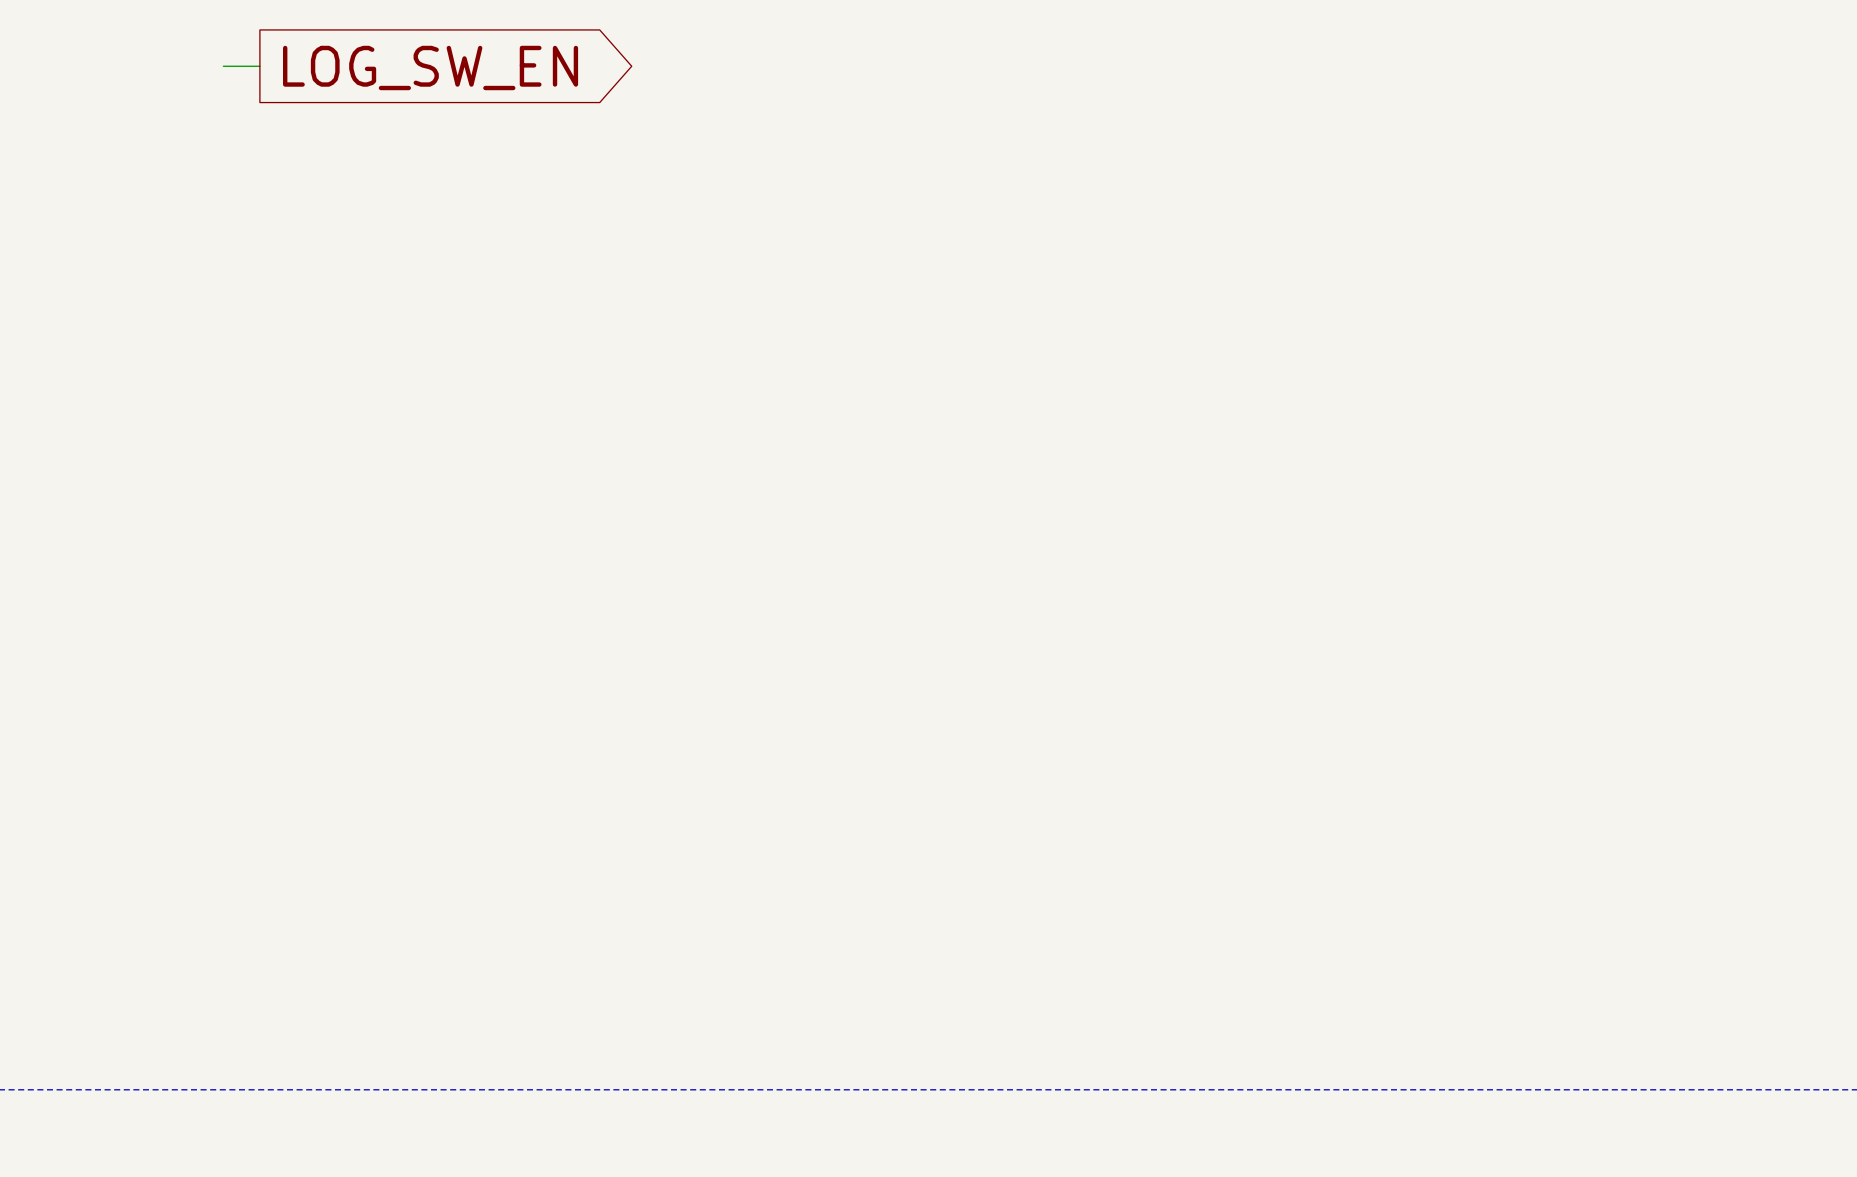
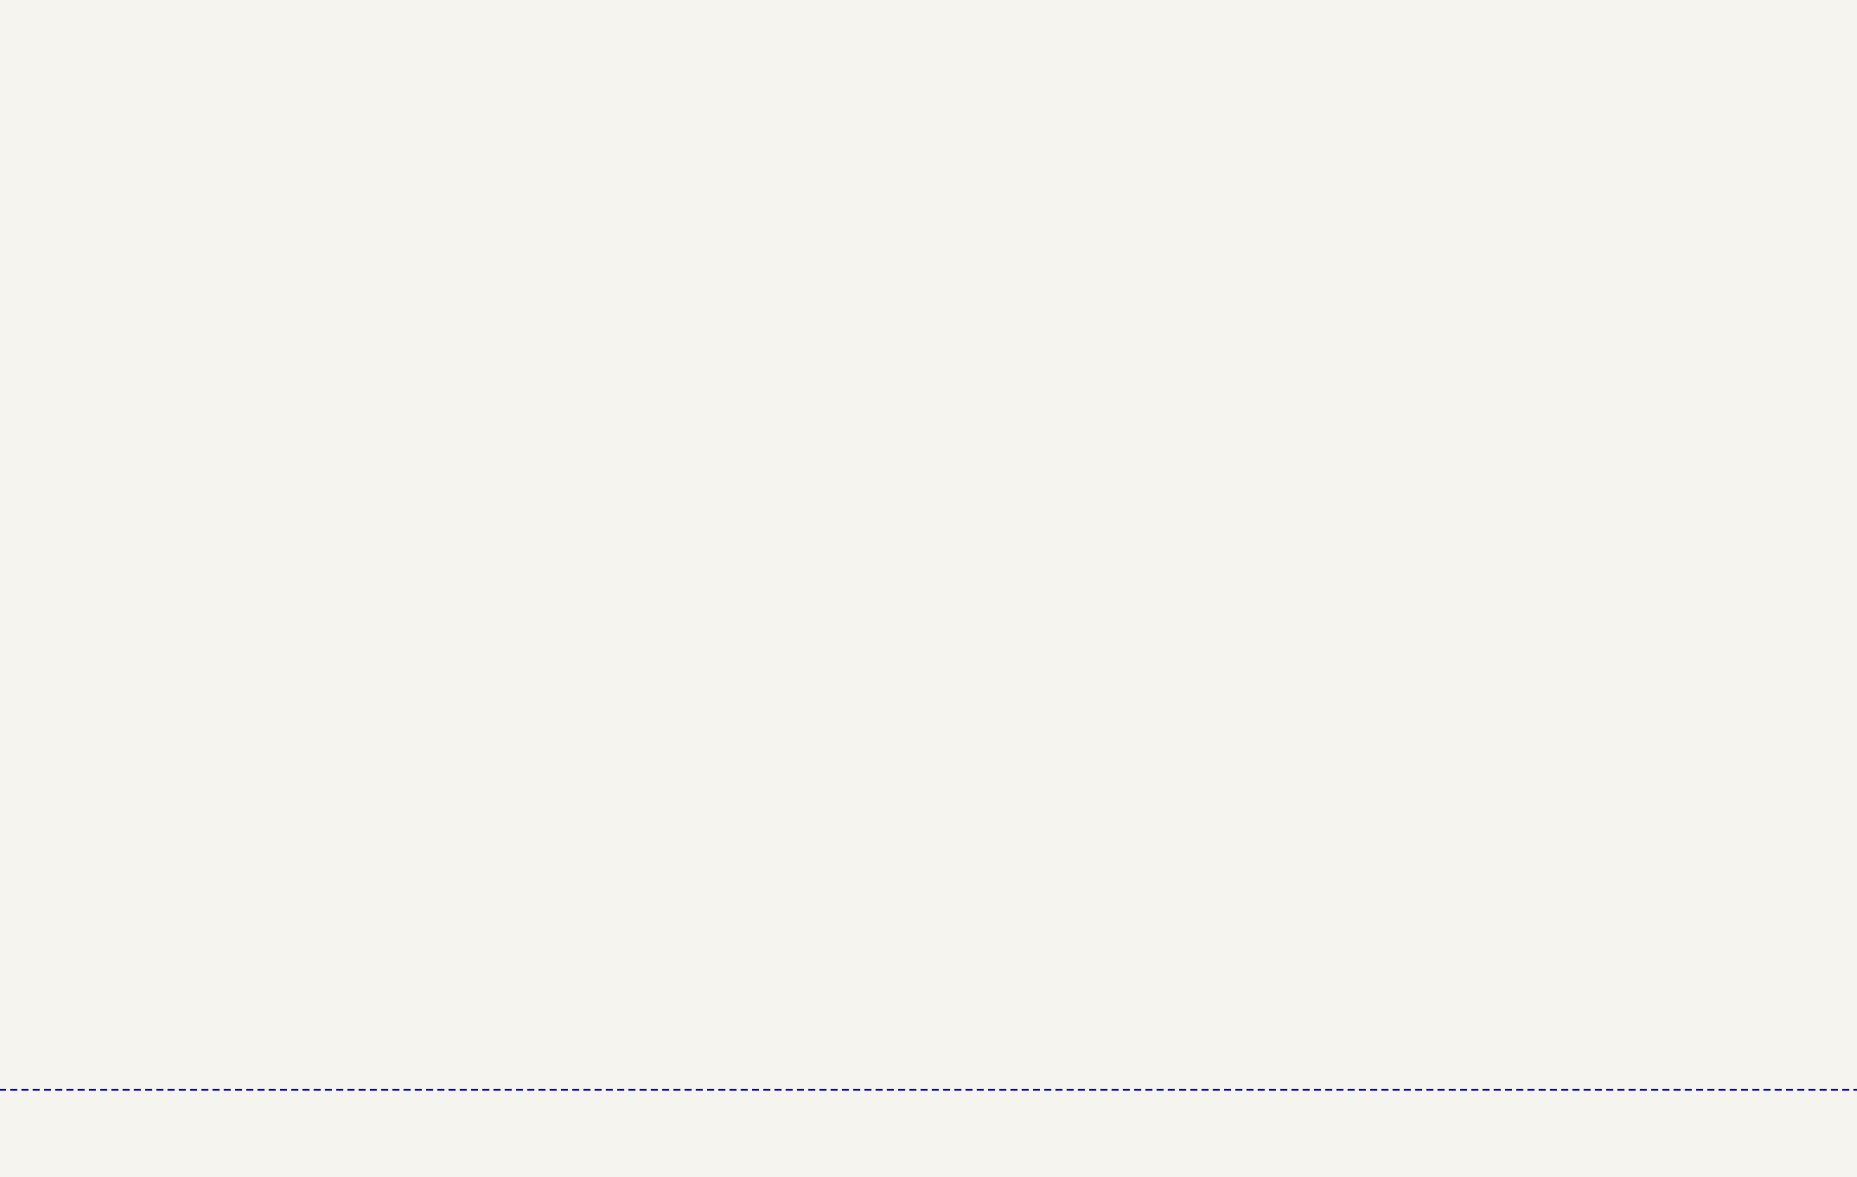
wire: (223, 66) (259, 66) -> none
global label: LOG_SW_EN (430, 68) -> none

